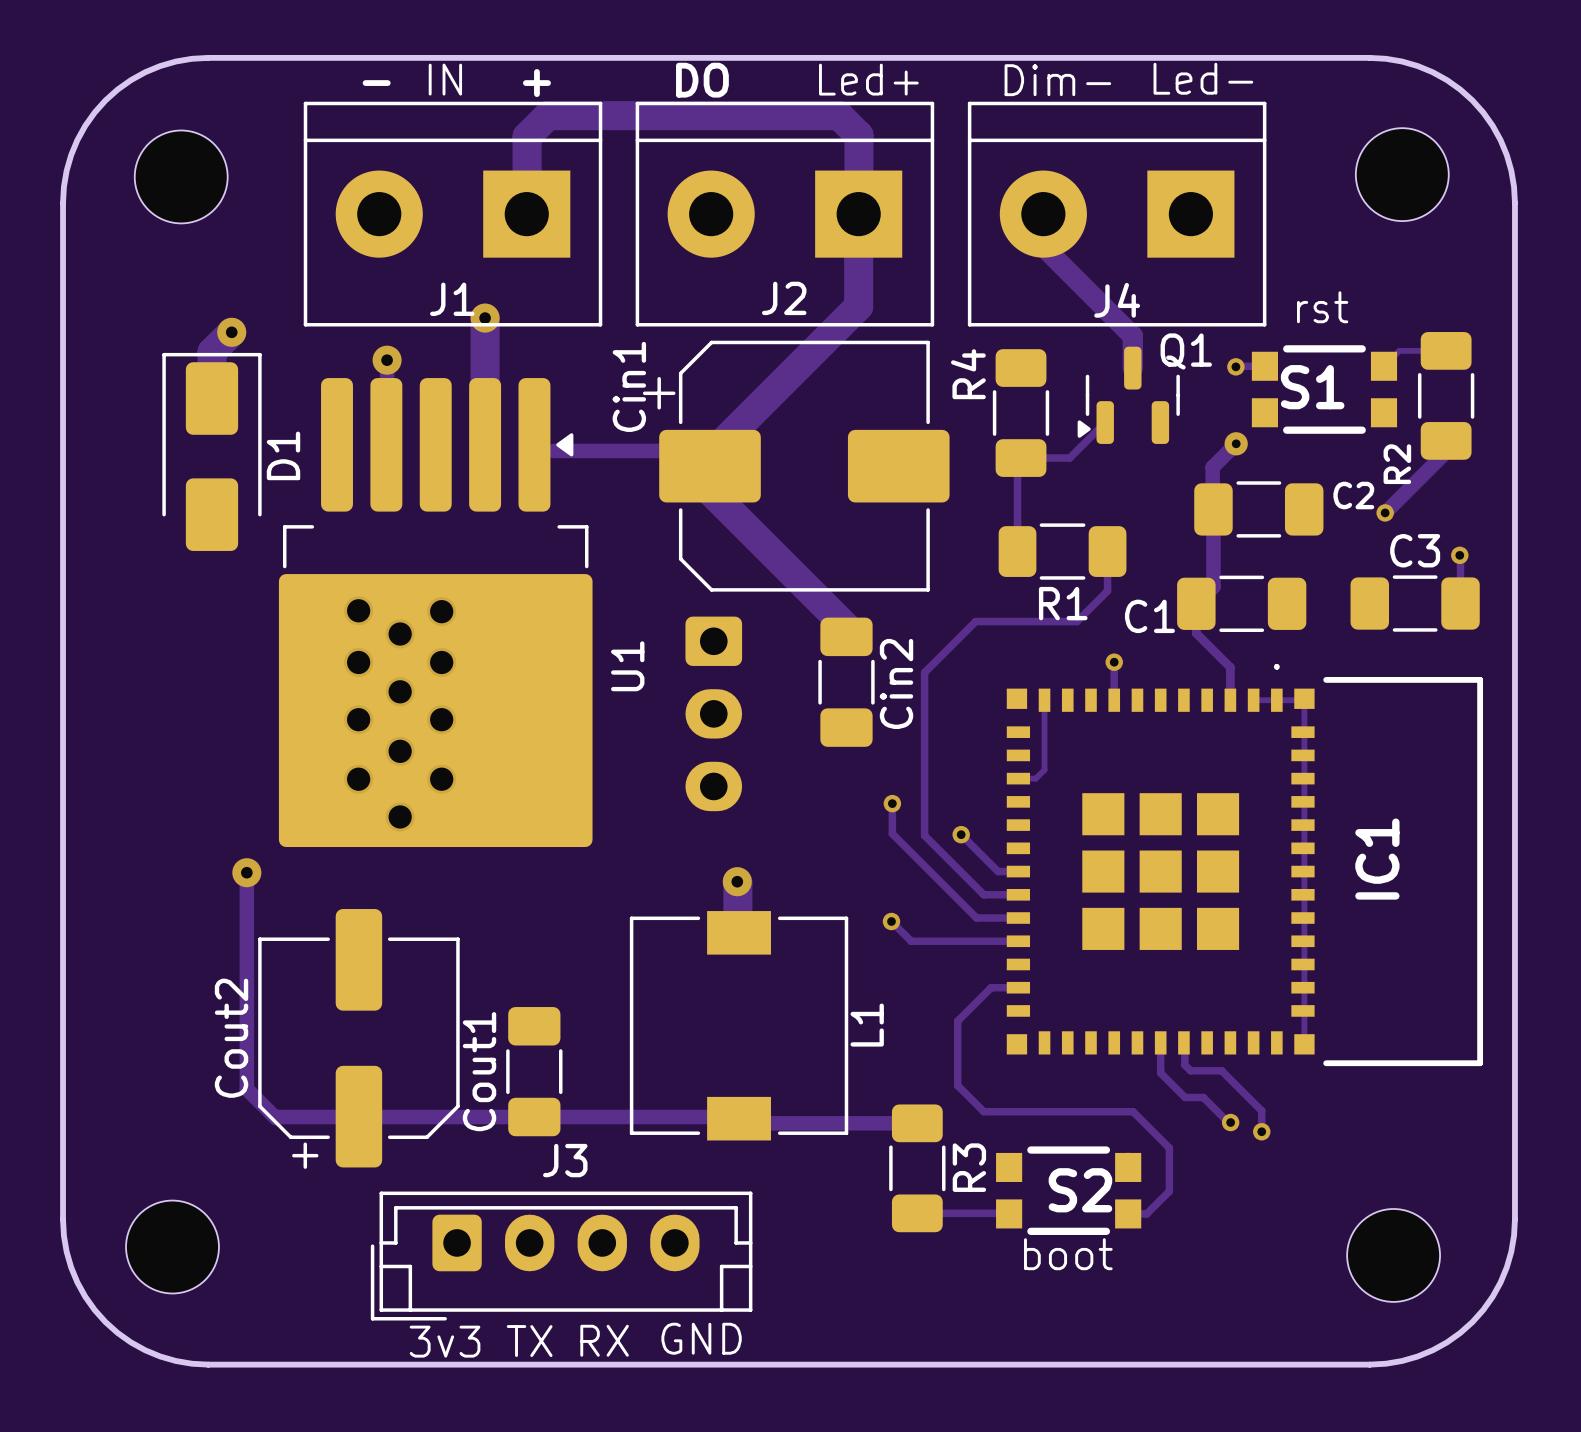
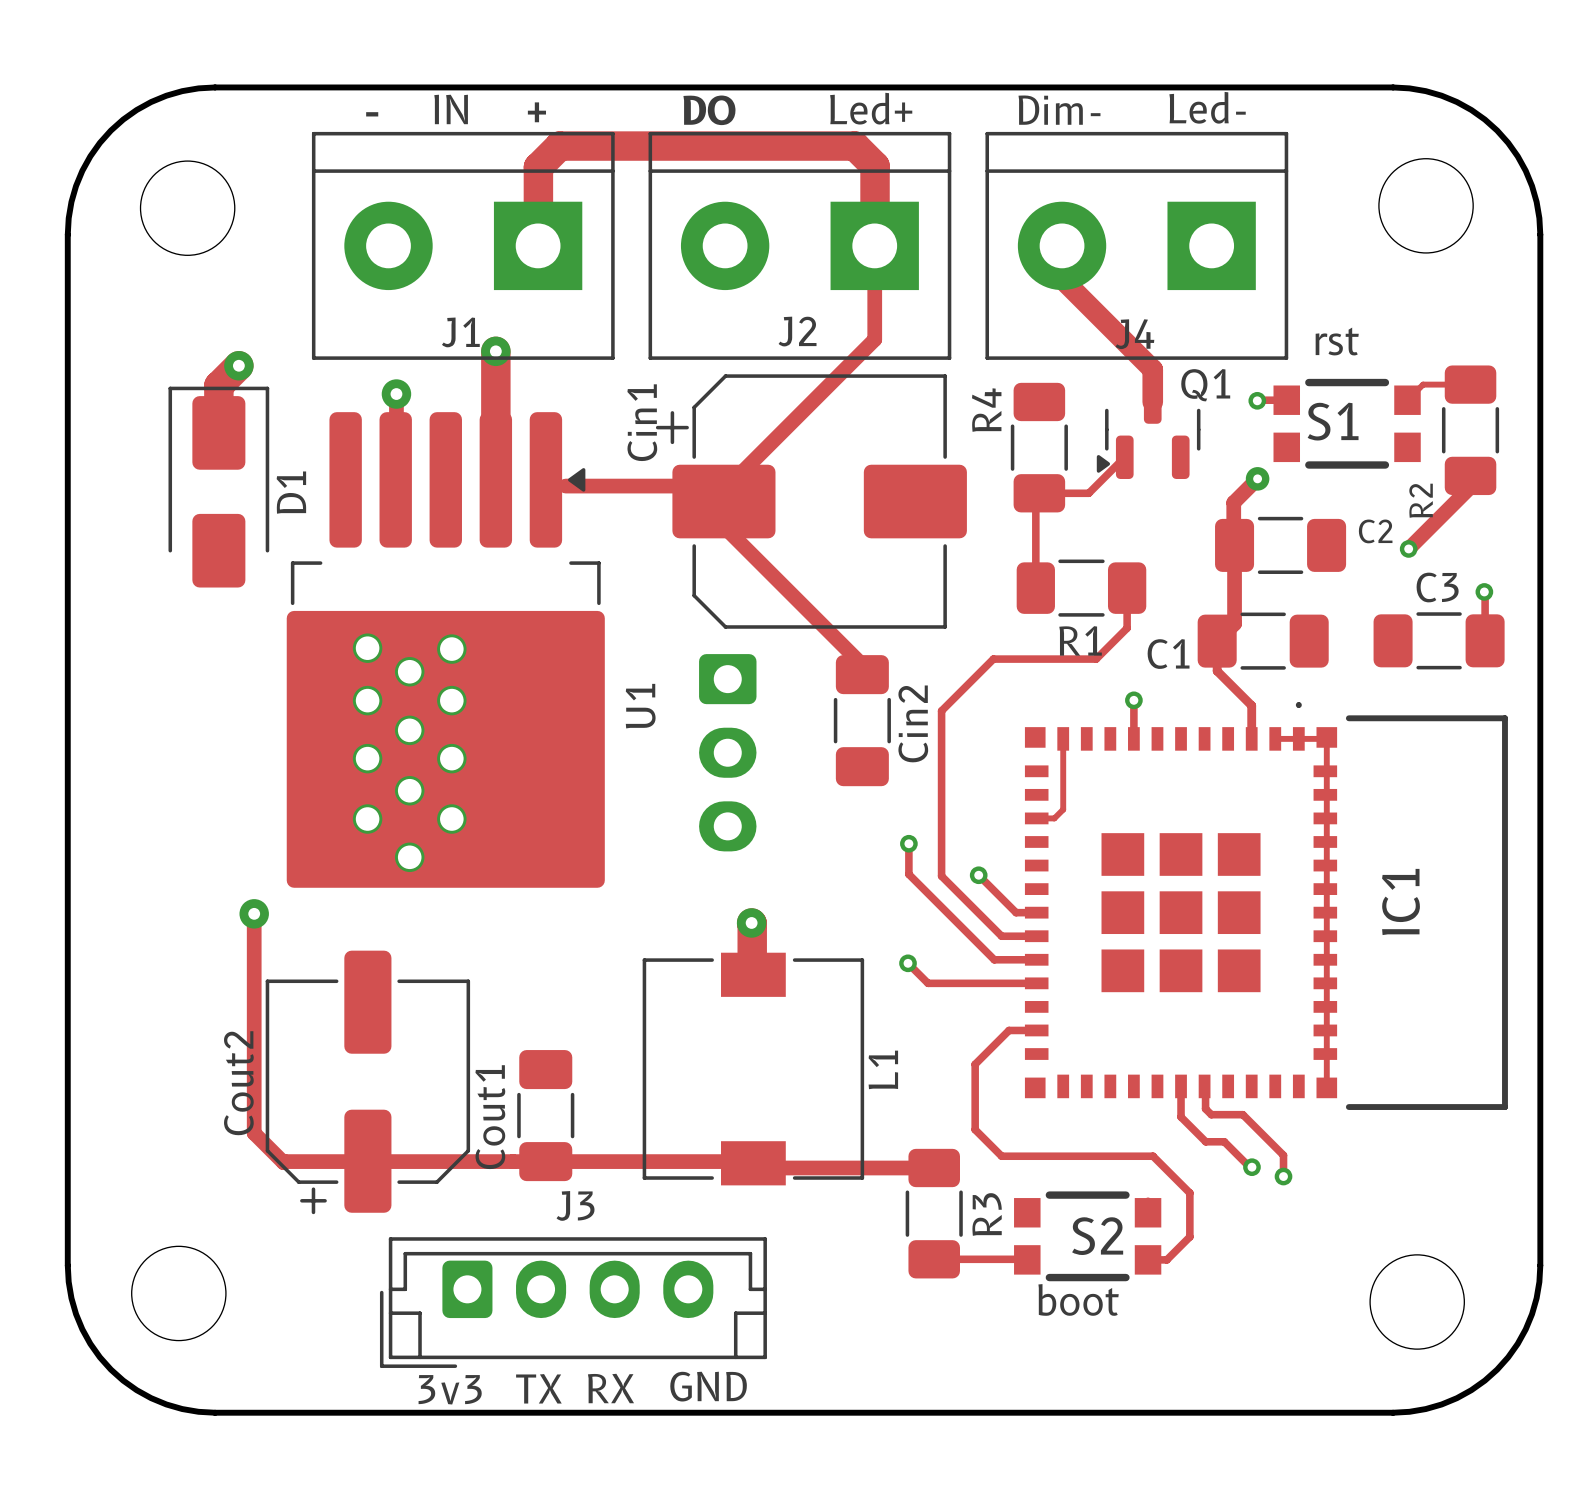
track width: thick (858, 214) (858, 306) (710, 455) -> thin (874, 245) (874, 339) (723, 490)
track width: thick (710, 490) (846, 627) -> thin (723, 526) (862, 664)

